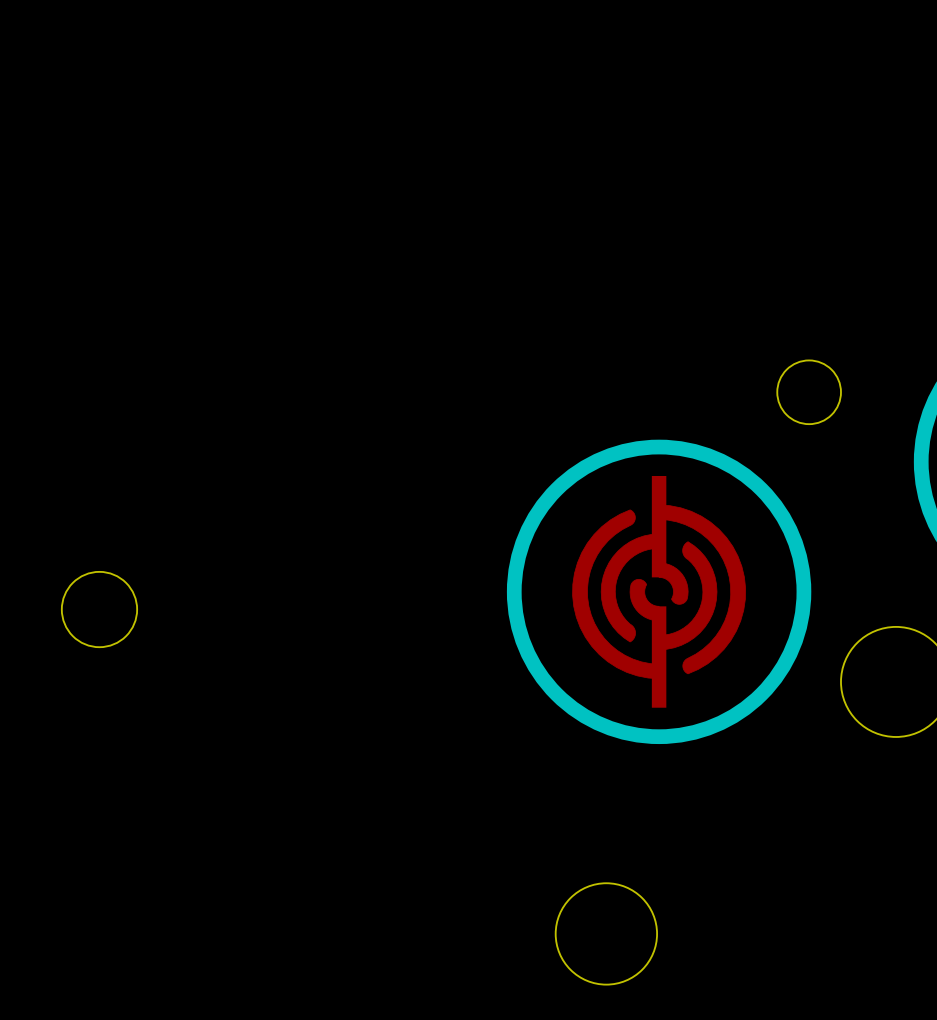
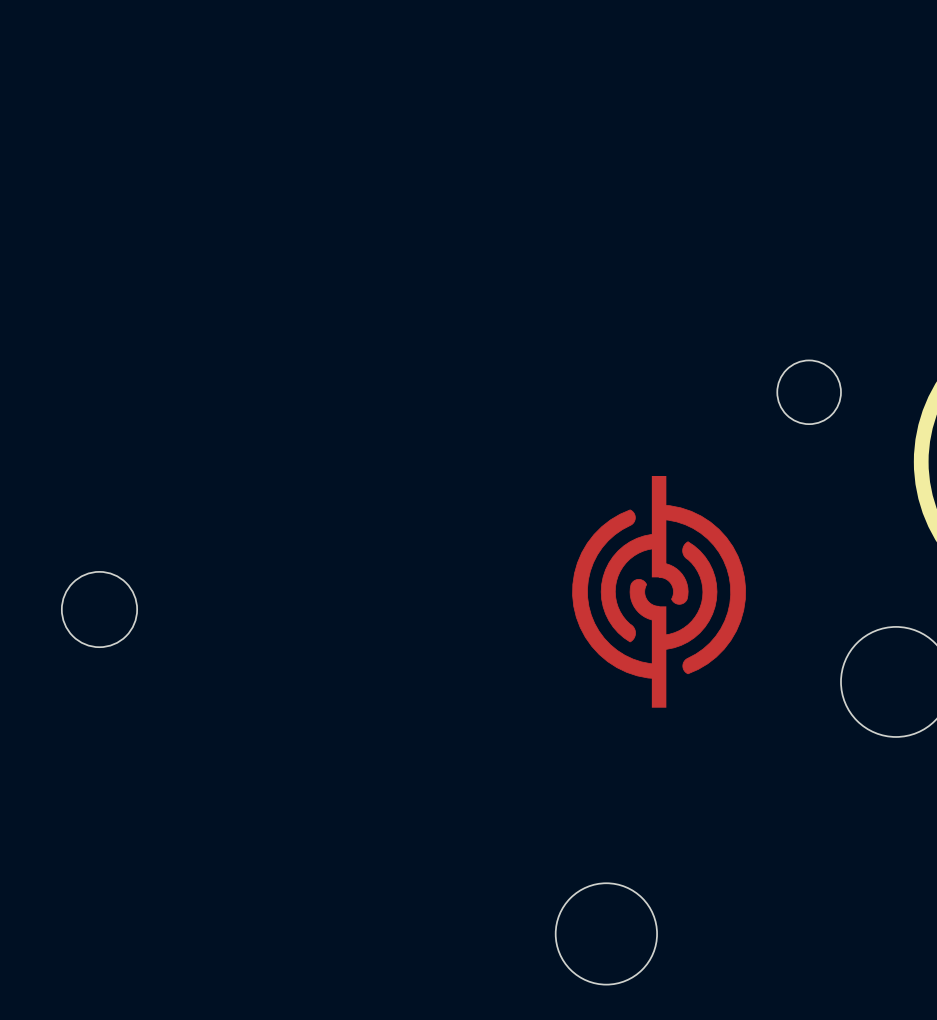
drawing: [506, 439, 812, 745] -> none

